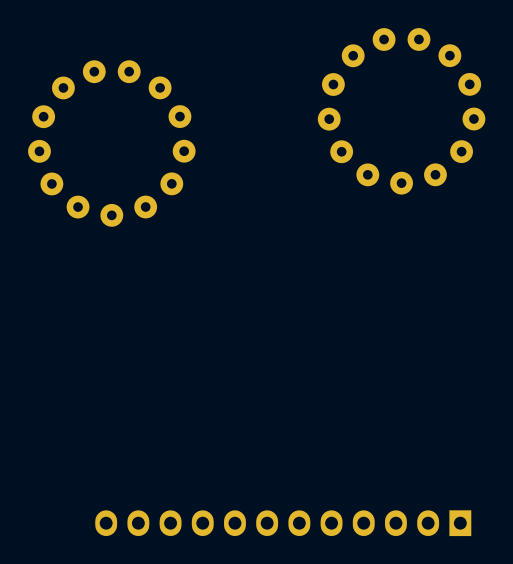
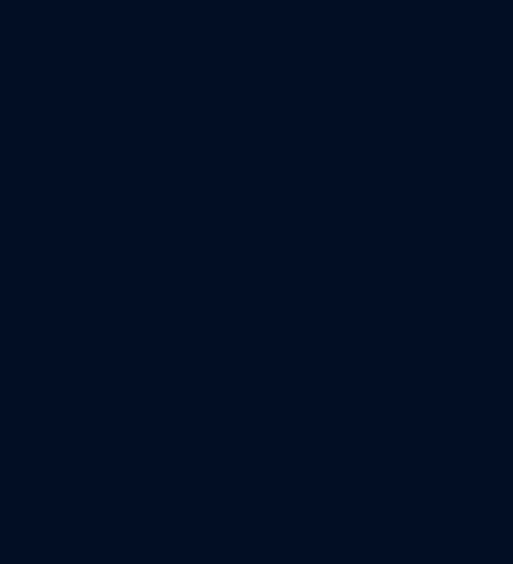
part: (401, 111) -> none
part: (111, 143) -> none
part: (283, 523) -> none

